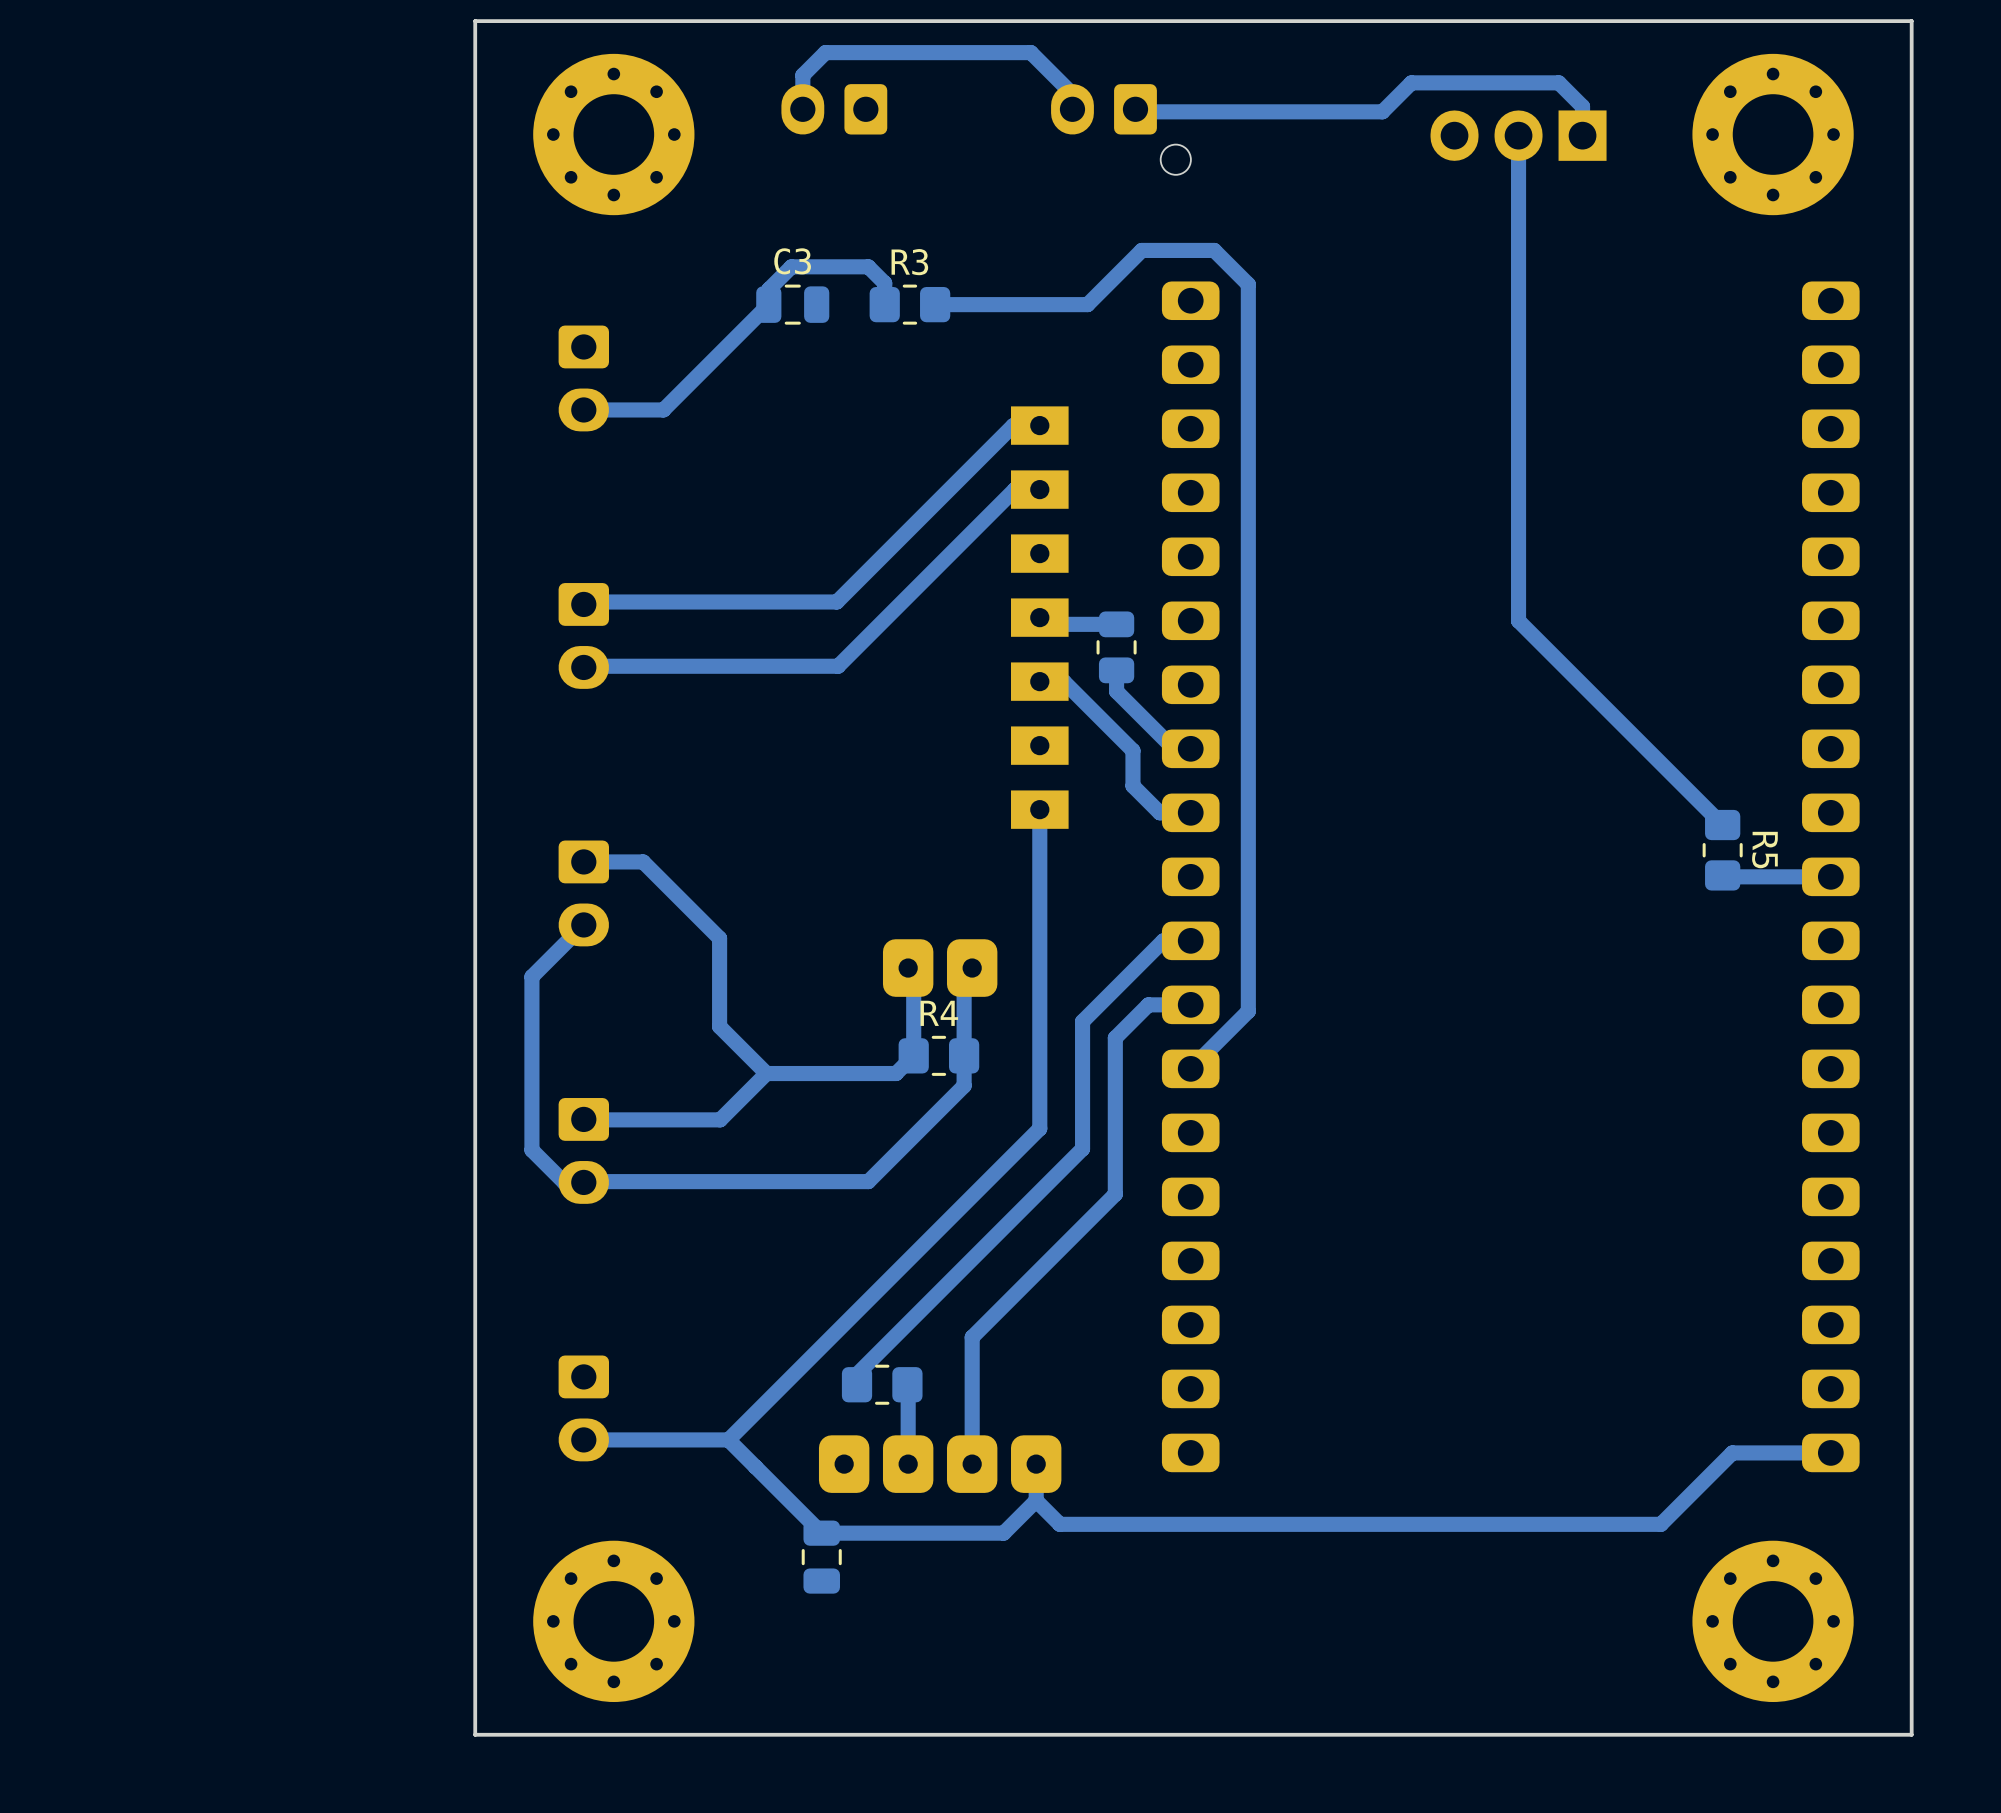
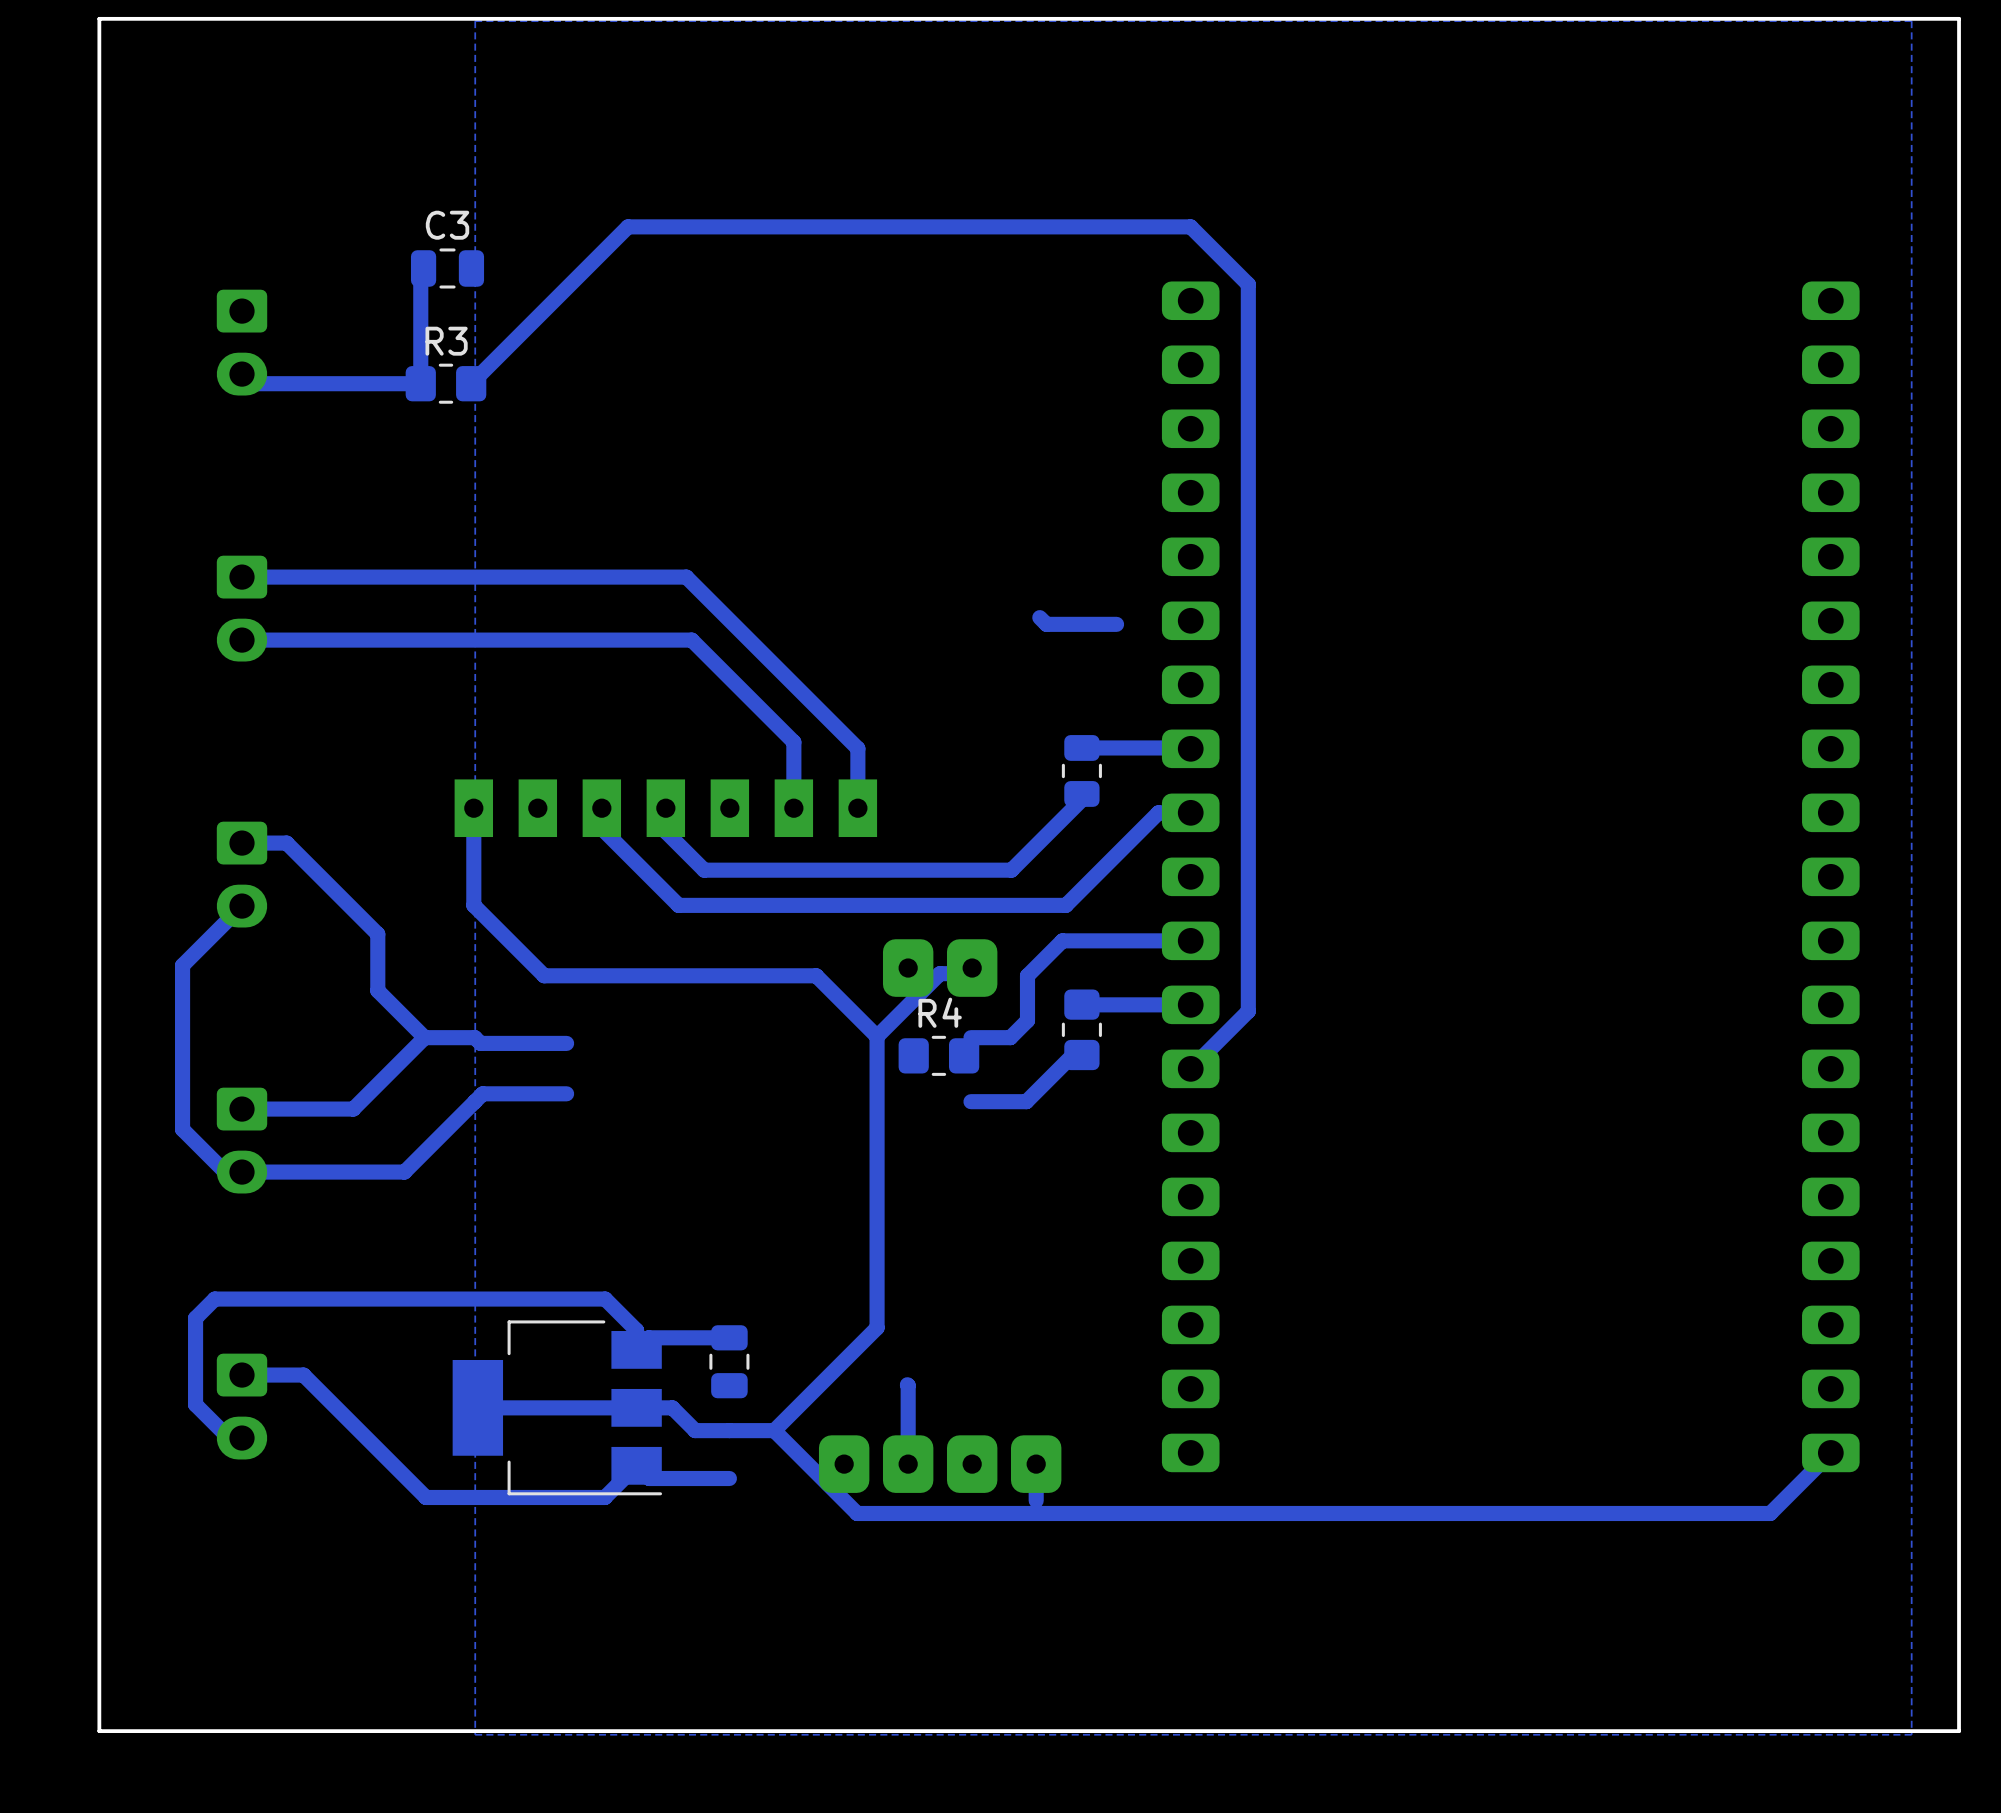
board edge: (1911, 21) (475, 21) (475, 1734) (1911, 1734) (1911, 21) -> (1959, 18) (1959, 1731) (99, 1731) (99, 18) (1959, 18)
part: (834, 109) -> none
bottom track: (1072, 109) (1072, 94) (1030, 52) (825, 52) (802, 75) (802, 109) -> none
bottom track: (1135, 109) (1138, 111) (1382, 111) (1411, 82) (1558, 82) (1582, 106) (1582, 135) -> none
part: (1120, 129) -> none
part: (613, 134) -> none
part: (1773, 134) -> none
bottom track: (1518, 135) (1518, 620) (1722, 825) -> none
part: (1518, 135) -> none
bottom track: (1214, 250) (1141, 250) (1087, 304) (935, 304) -> (1214, 250) (1190, 226) (628, 226) (471, 383)
bottom track: none -> (423, 268) (420, 271) (420, 383) (251, 383) (242, 374)
C3 position: (792, 304) -> (447, 268)
bottom track: (884, 304) (884, 283) (868, 266) (791, 266) (768, 289) (768, 304) (663, 409) (583, 409) -> none
R3 position: (909, 304) -> (445, 383)
part: none -> (242, 342)
part: (583, 378) -> none
bottom track: (1039, 425) (1013, 425) (836, 601) (586, 601) (583, 604) -> none
bottom track: (1039, 489) (1014, 489) (838, 666) (583, 667) -> none
bottom track: none -> (242, 577) (686, 577) (857, 748) (857, 808)
part: none -> (242, 608)
part rotation: 0° (1039, 617) -> 90° clockwise (665, 808)
part position: (1039, 617) -> (665, 808)
part: (583, 635) -> none
bottom track: none -> (242, 640) (691, 640) (793, 742) (793, 808)
part position: (1116, 647) -> (1081, 770)
bottom track: (1116, 670) (1116, 691) (1173, 748) -> none
bottom track: (1039, 681) (1063, 681) (1132, 750) (1132, 785) (1159, 812) -> (601, 808) (601, 828) (678, 905) (1065, 905) (1159, 812)
bottom track: none -> (1189, 747) (1081, 747)
bottom track: none -> (1081, 793) (1081, 799) (1011, 870) (704, 870) (665, 831) (665, 808)
bottom track: none -> (473, 808) (473, 905) (544, 975) (816, 975) (877, 1036)
bottom track: (1039, 809) (1039, 1128) (728, 1439) -> none
bottom track: none -> (242, 843) (286, 843) (377, 934) (377, 990) (424, 1037)
R5: (1722, 850) -> none
bottom track: (583, 861) (643, 861) (719, 938) (719, 1026) (766, 1073) -> none
part: none -> (242, 874)
bottom track: (1722, 875) (1830, 876) -> none
part: (583, 893) -> none
bottom track: none -> (242, 906) (182, 965) (182, 1129) (225, 1172) (242, 1172)
bottom track: (583, 924) (531, 976) (531, 1150) (564, 1182) (868, 1181) (964, 1085) (964, 976) (972, 968) -> none
bottom track: (1163, 940) (1082, 1021) (1082, 1148) (857, 1374) (857, 1384) -> (1163, 940) (1062, 940) (1027, 975) (1027, 1020) (1010, 1037) (970, 1037)
bottom track: (908, 968) (913, 973) (913, 1055) (896, 1073) (766, 1073) -> none
bottom track: none -> (970, 973) (940, 973) (877, 1036)
bottom track: (1148, 1004) (1115, 1037) (1115, 1194) (972, 1337) (972, 1464) -> (1148, 1004) (1082, 1004)
bottom track: none -> (877, 1036) (877, 1327) (774, 1430)
bottom track: none -> (424, 1037) (353, 1109) (246, 1109)
bottom track: none -> (424, 1037) (474, 1037) (480, 1043) (566, 1043)
bottom track: none -> (1081, 1055) (1073, 1055) (1026, 1101) (970, 1101)
bottom track: (766, 1073) (720, 1119) (583, 1119) -> none
bottom track: none -> (566, 1093) (482, 1093) (404, 1172) (246, 1172)
part: none -> (242, 1140)
part: (583, 1150) -> none
bottom track: none -> (729, 1337) (648, 1337) (636, 1349) (636, 1330) (605, 1299) (214, 1299) (195, 1318) (195, 1404) (228, 1438) (246, 1438)
bottom track: none -> (246, 1375) (303, 1375) (426, 1497) (604, 1497) (636, 1465) (649, 1478) (729, 1478)
part rotation: 0° (882, 1384) -> 90° clockwise (1081, 1029)
part position: (882, 1384) -> (1081, 1029)
part: none -> (242, 1406)
bottom track: none -> (477, 1407) (672, 1407) (695, 1430) (774, 1430)
part: none -> (557, 1407)
part: (583, 1408) -> none
bottom track: (728, 1439) (821, 1533) (1003, 1533) (1036, 1500) (1059, 1524) (1660, 1524) (1732, 1452) (1830, 1452) -> (774, 1430) (857, 1513) (1770, 1513) (1830, 1452)
bottom track: (728, 1439) (583, 1439) -> none
part position: (821, 1557) -> (729, 1361)
part: (613, 1621) -> none
part: (1773, 1621) -> none

